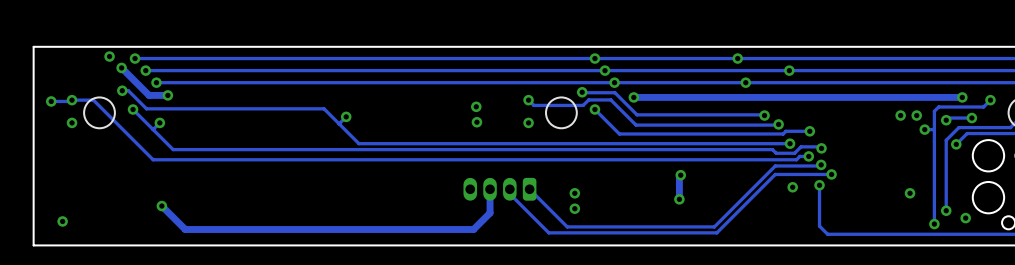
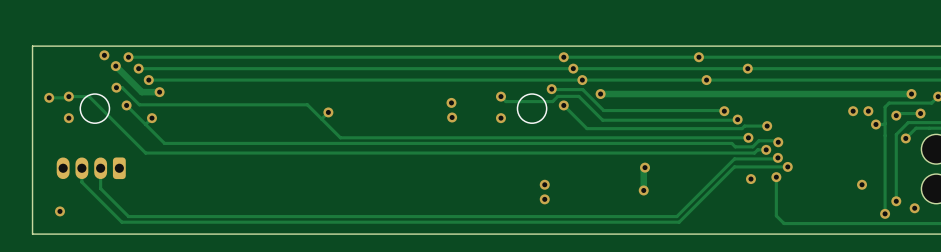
part: none -> (91, 168)
track: (490, 189) (490, 213) (473, 229) (185, 229) (161, 206) -> none
part: (499, 189) -> none
track: (509, 189) (509, 193) (548, 232) -> (81, 168) (81, 182) (121, 222) (520, 222)
track: (529, 189) (567, 226) -> (100, 168) (100, 188) (128, 216) (537, 216)
via: (161, 206) -> none

